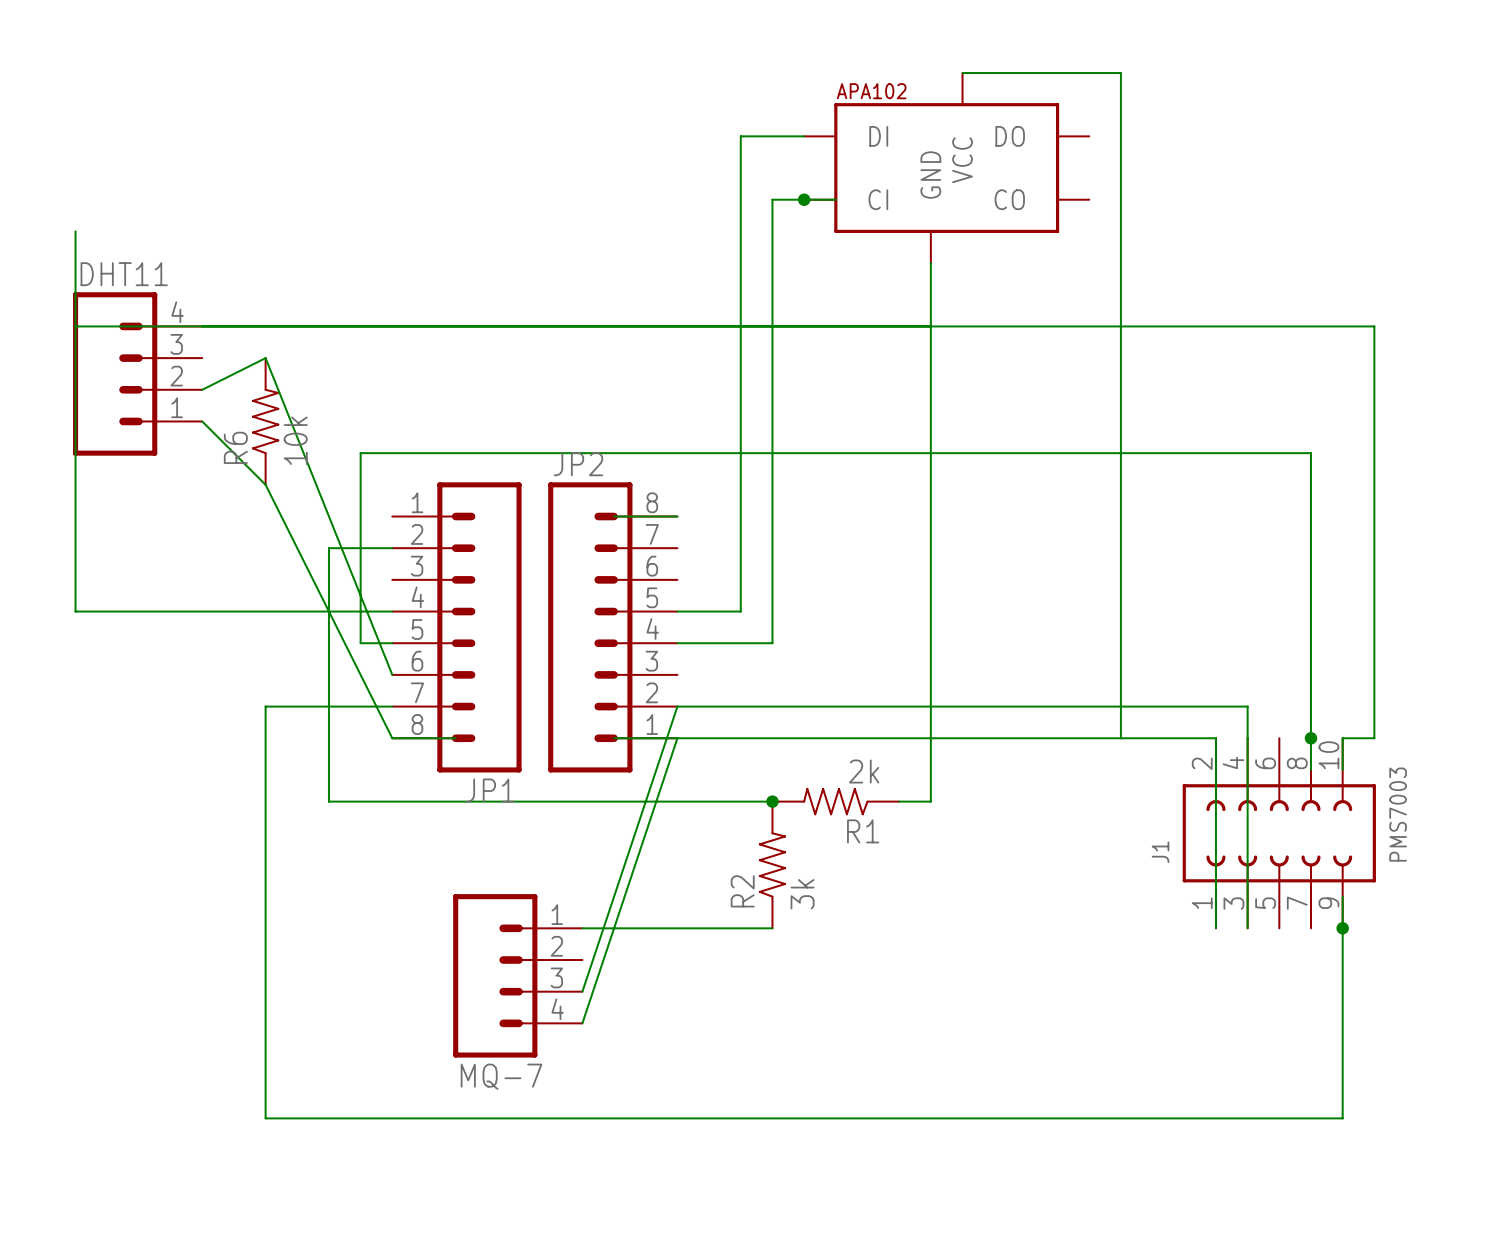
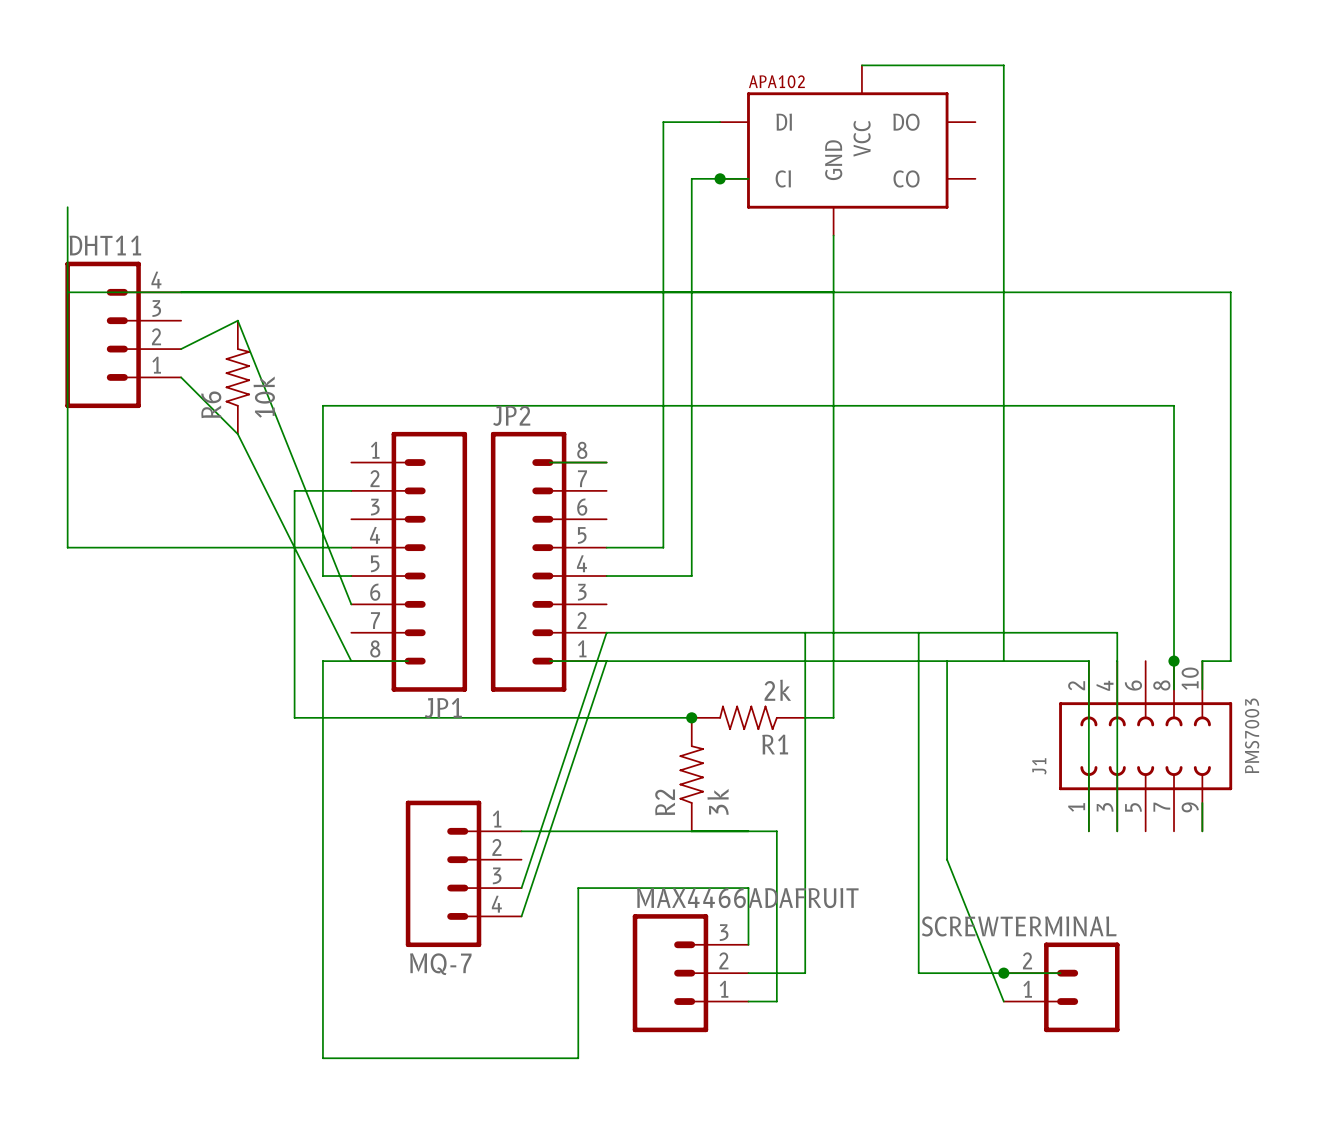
wire: (392, 706) (265, 706) (265, 1118) (835, 1118) -> none
wire: none -> (805, 632) (805, 973) (748, 973)
wire: none -> (918, 632) (918, 973) (1060, 973)
wire: none -> (351, 661) (322, 661) (322, 1058) (578, 1058) (578, 888) (748, 888) (748, 944)
wire: none -> (947, 661) (947, 859) (1003, 1001)
wire: (1342, 928) (1342, 1118) (867, 1118) -> (691, 831) (776, 831) (776, 1001)
junction: (1342, 928) -> none
MAX4466ADAFRUIT: none -> (690, 973)
junction: none -> (1003, 973)
SCREWTERMINAL: none -> (1061, 987)

